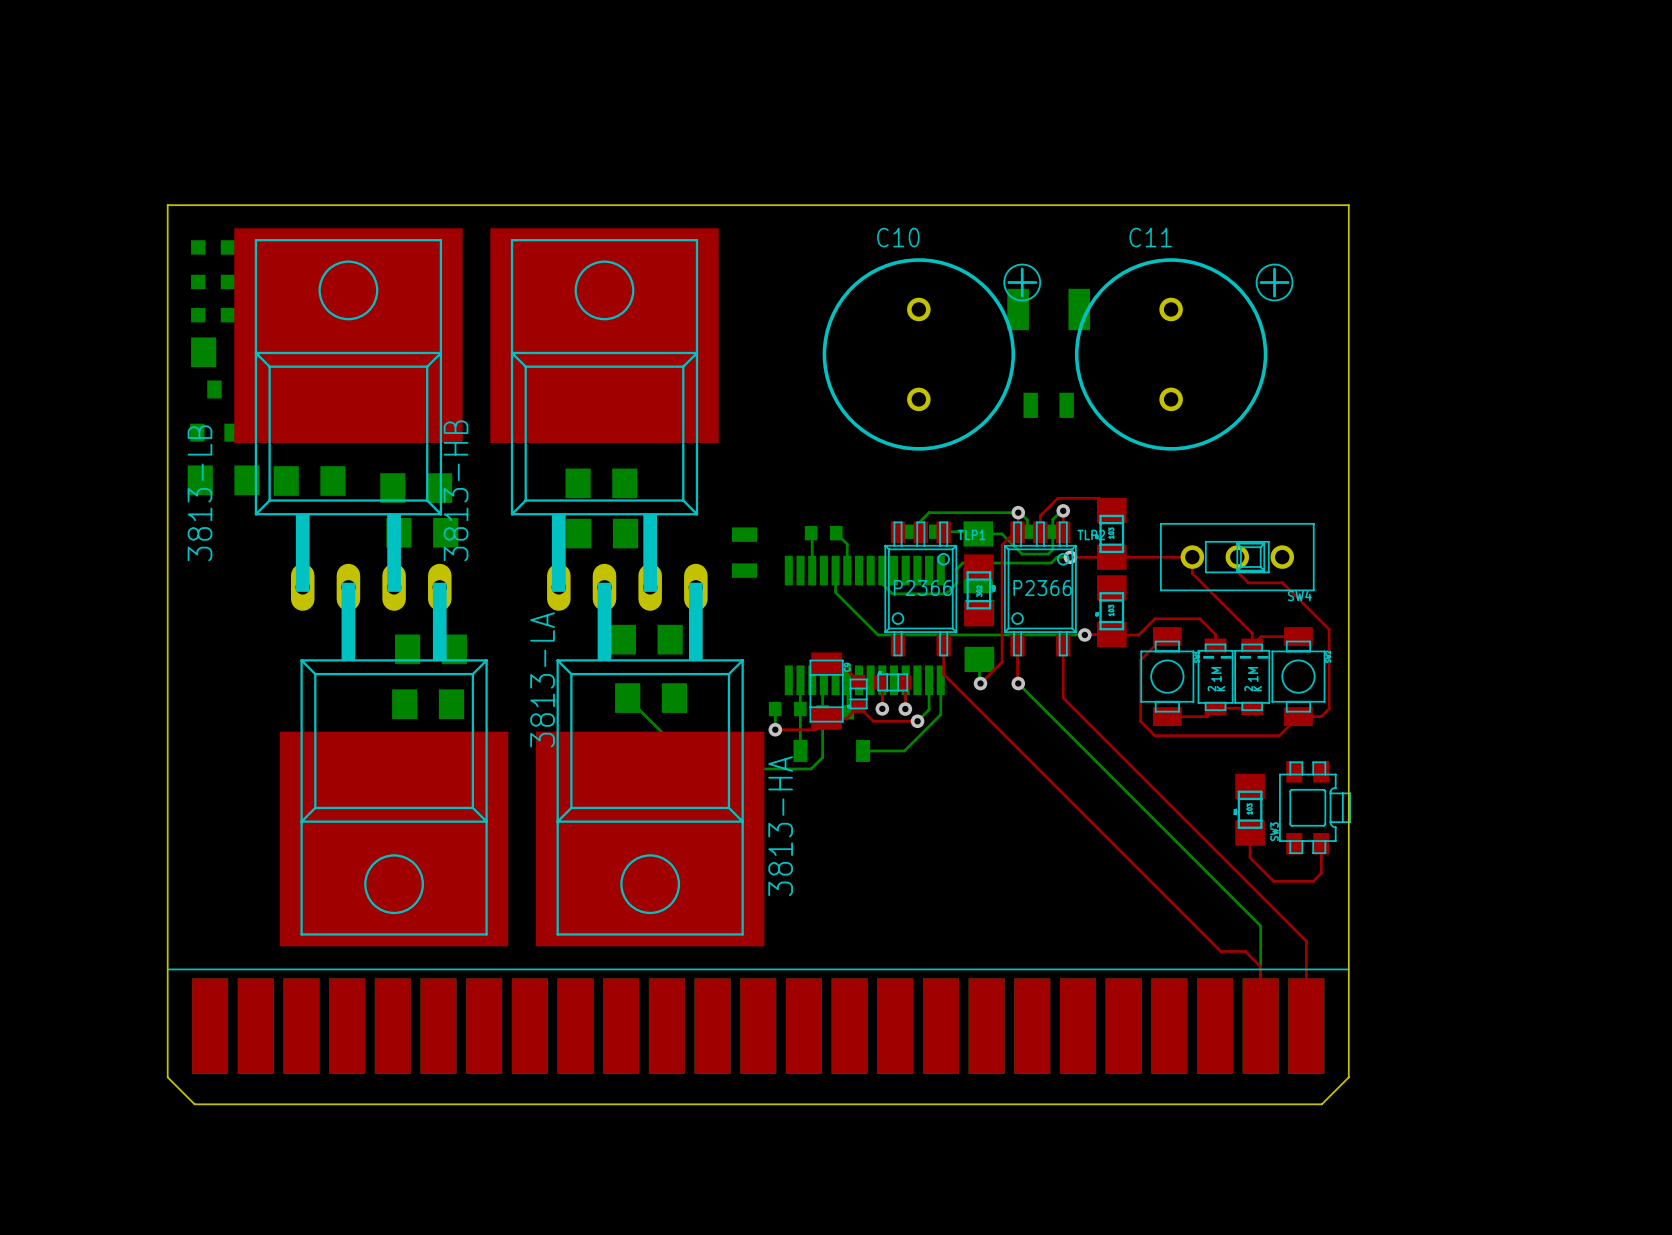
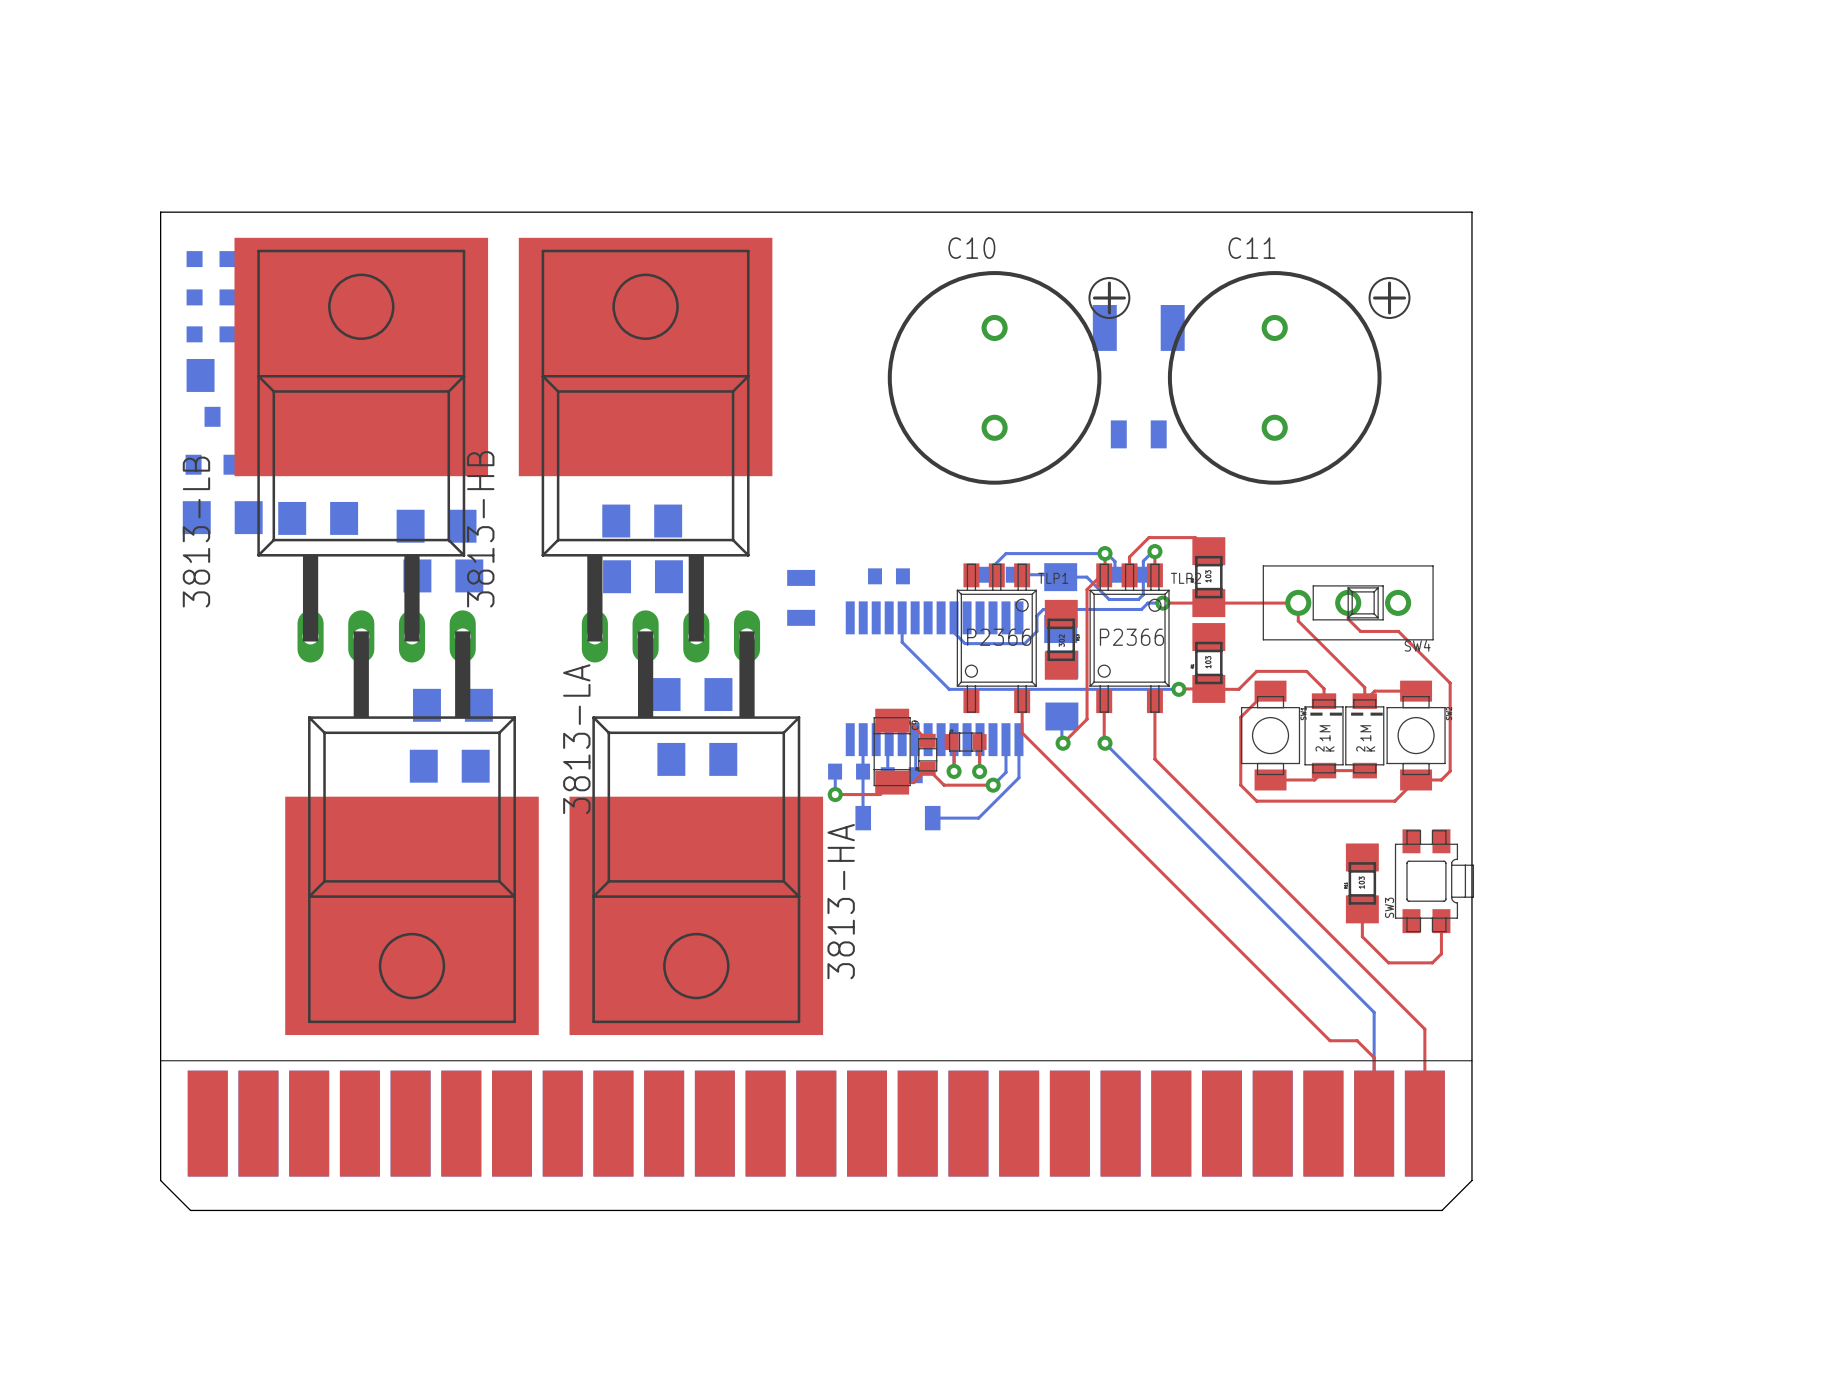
bottom track: (811, 533) (812, 570) -> none
bottom track: (836, 533) (847, 544) (847, 570) -> none
bottom track: (627, 698) (698, 768) (811, 768) (822, 757) (822, 712) -> none

